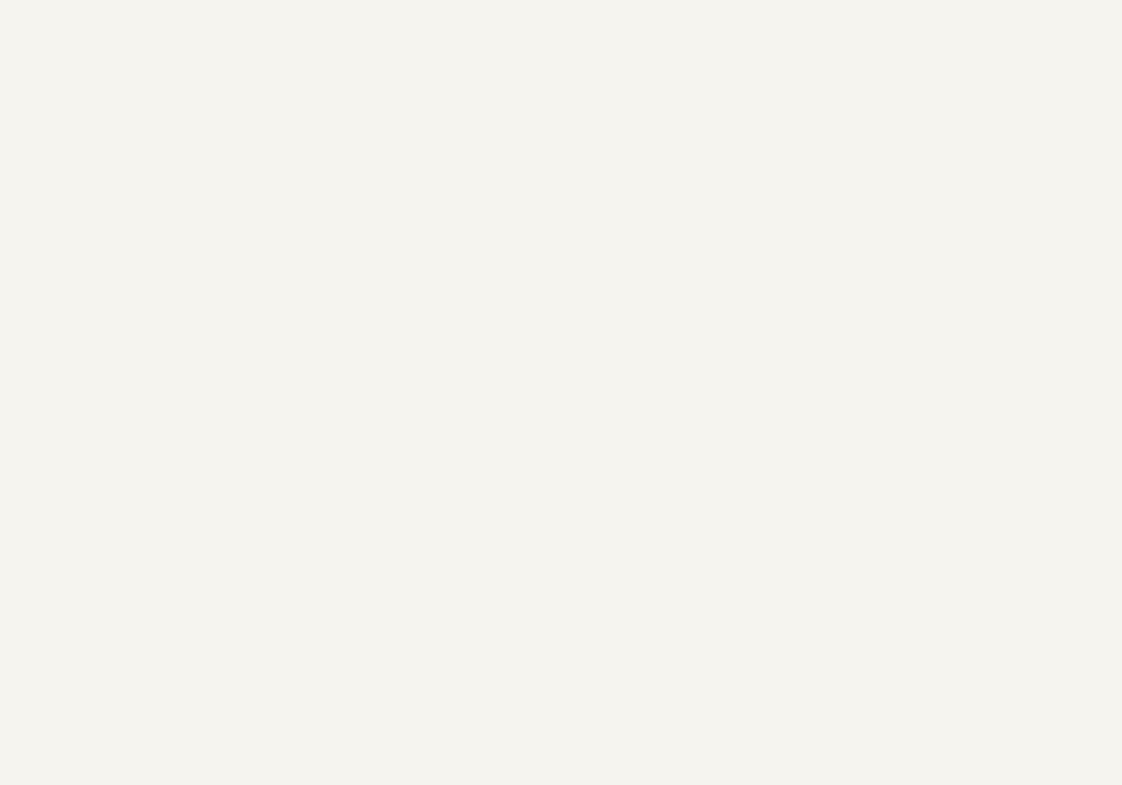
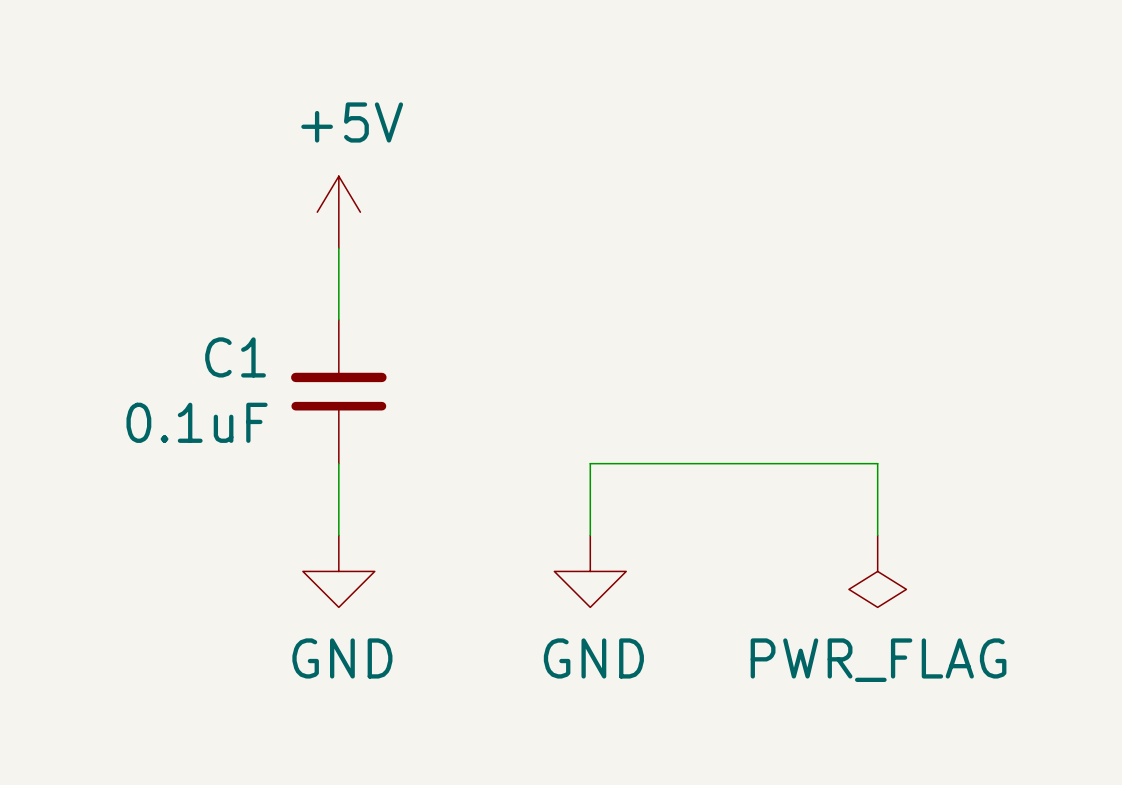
power symbol: none -> +5V (338, 212)
wire: none -> (338, 248) (338, 319)
C1: none -> 0.1uF (338, 391)
wire: none -> (338, 463) (338, 535)
wire: none -> (590, 535) (590, 463) (877, 463) (877, 535)
power symbol: none -> GND (338, 571)
power symbol: none -> GND (590, 571)
power symbol: none -> PWR_FLAG (877, 571)

